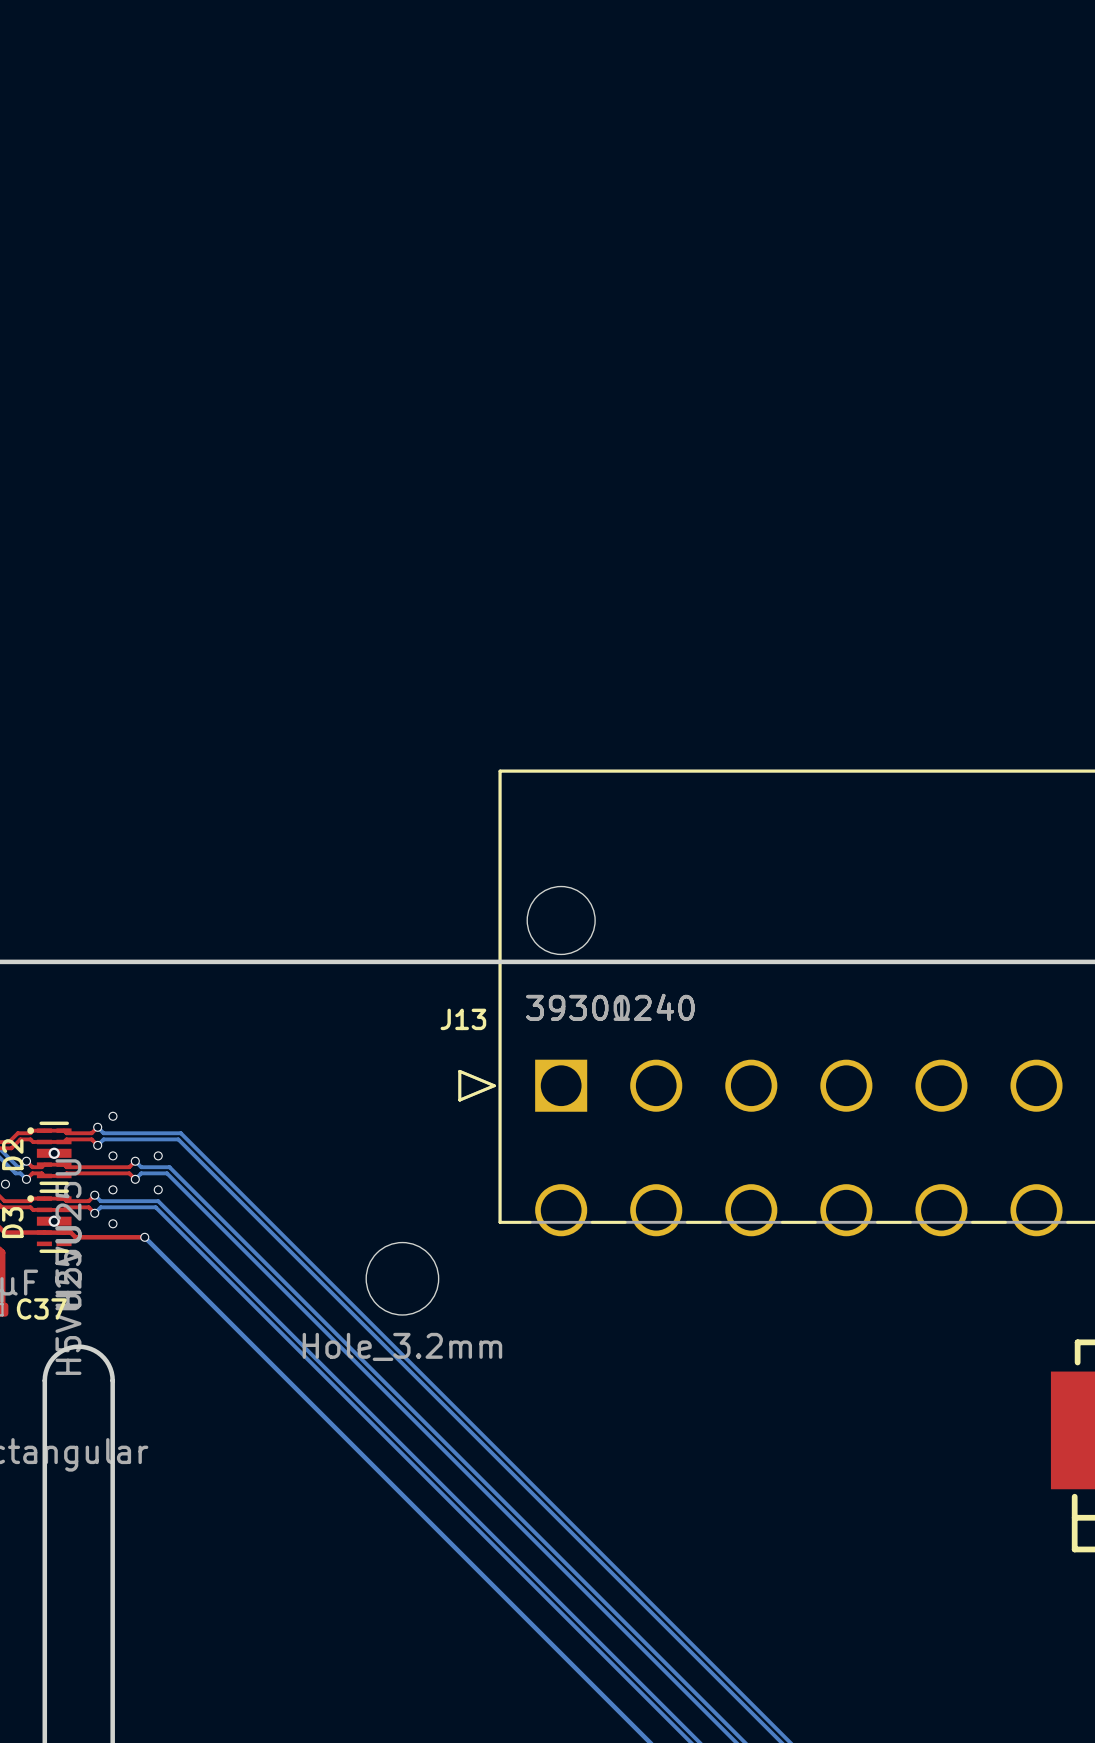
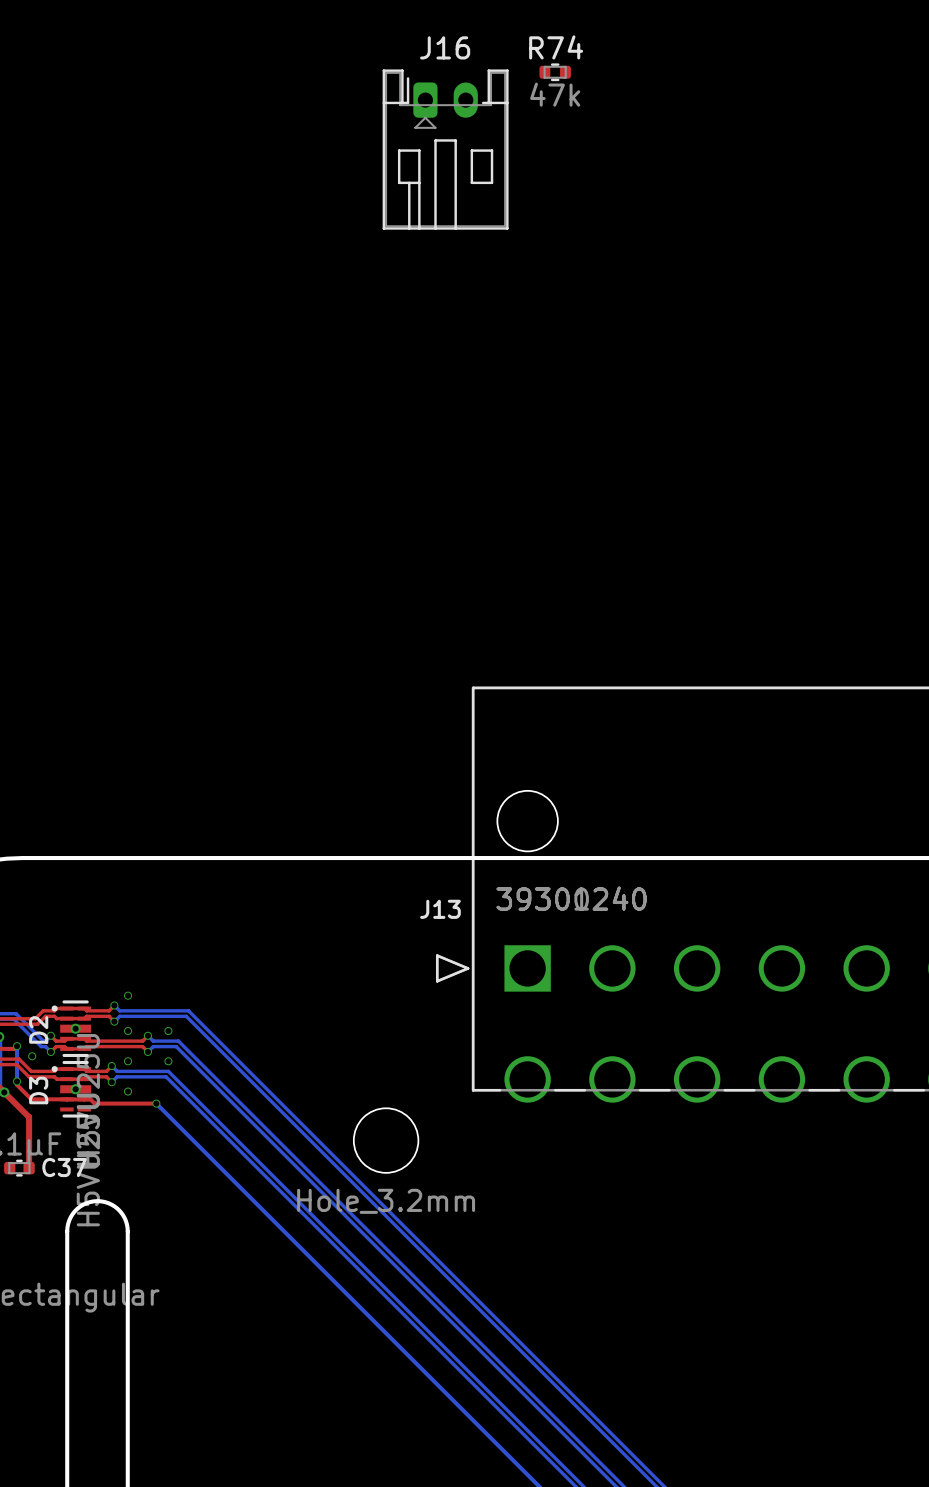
R74: none -> 47k (555, 72)
J16: none -> (445, 149)

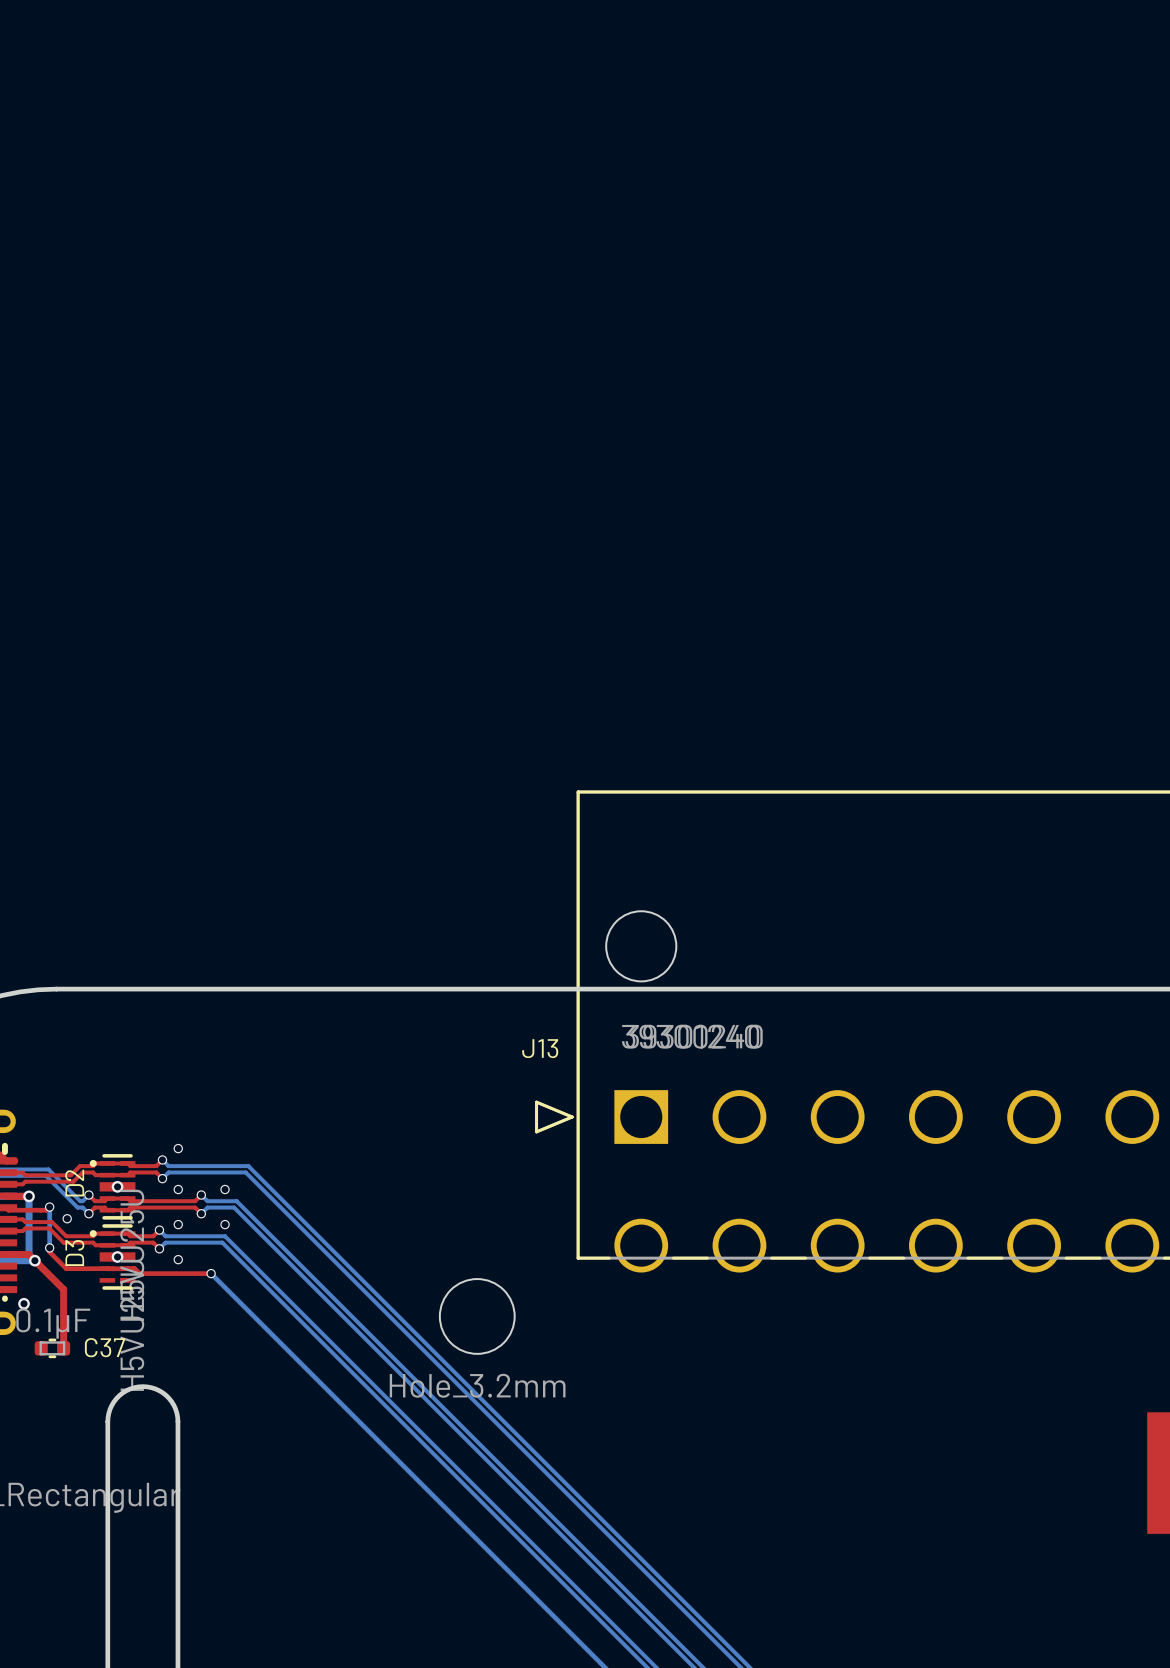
R74: 47k (555, 72) -> none
J16: (445, 149) -> none

